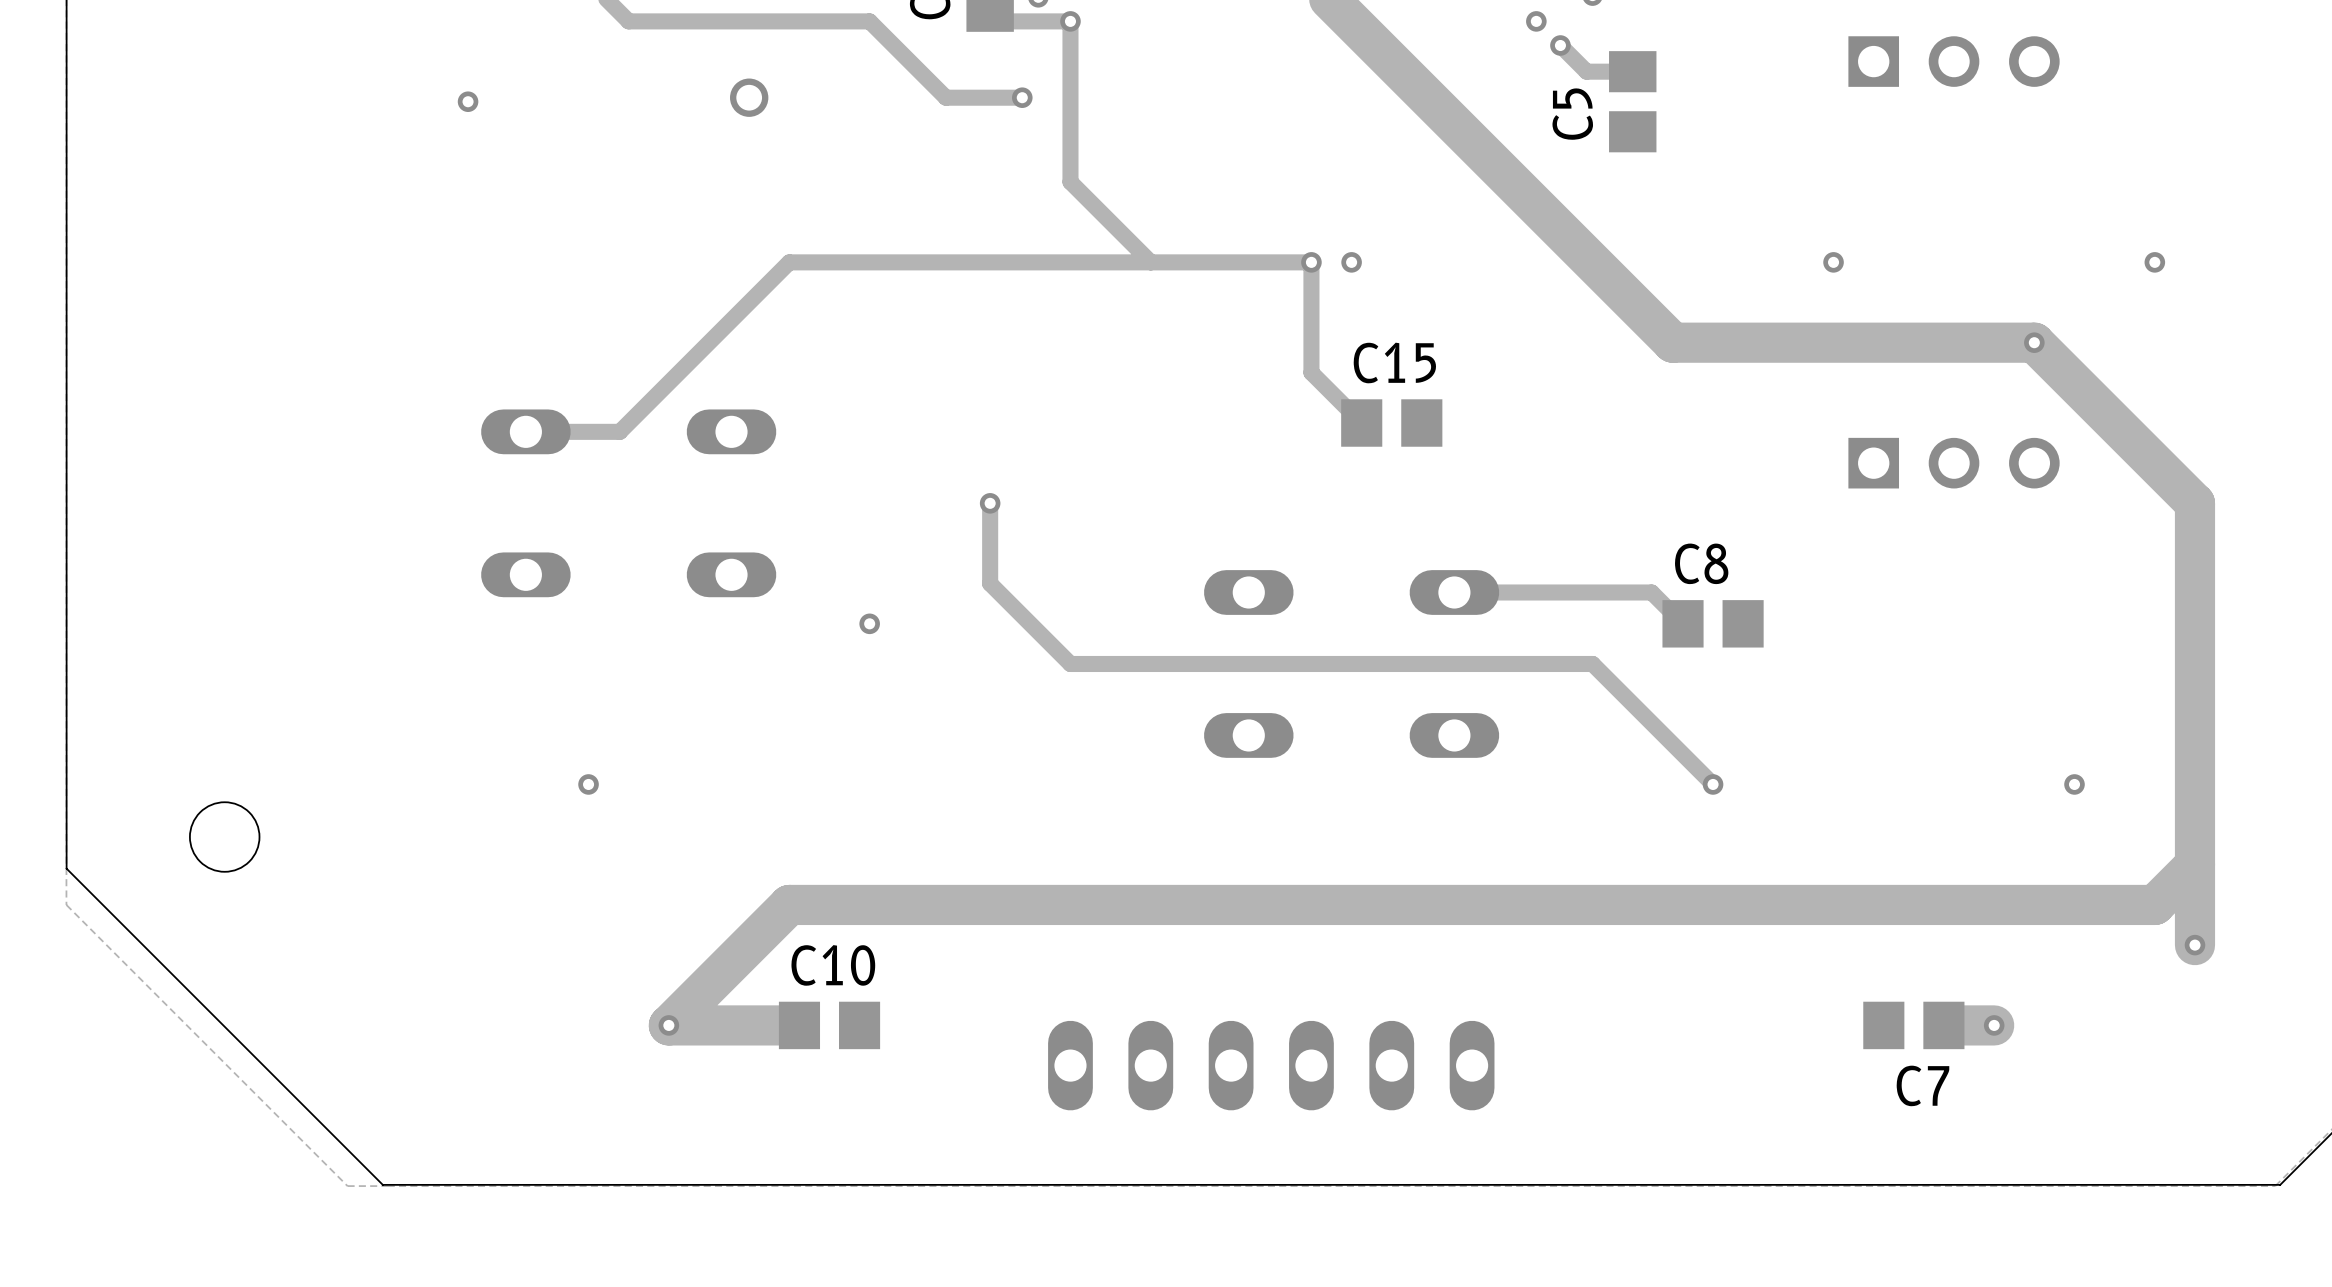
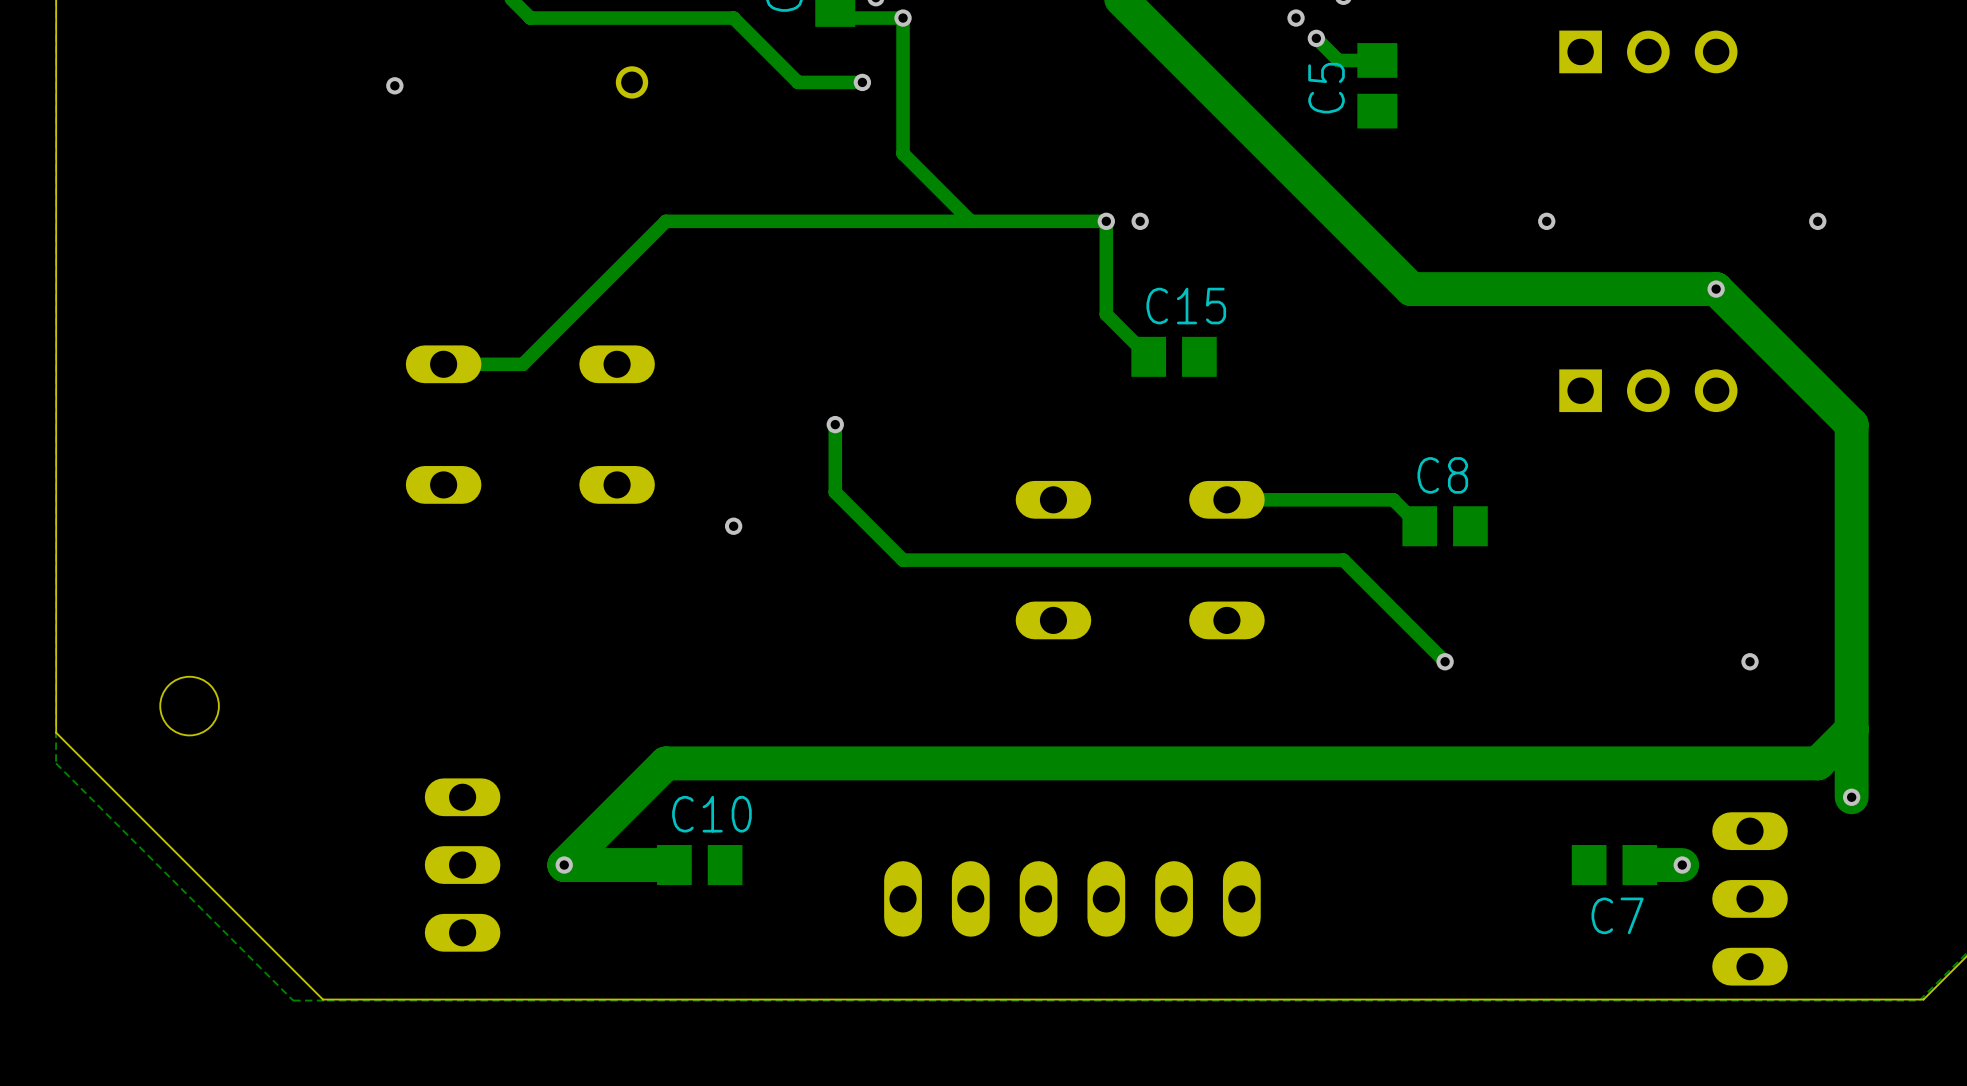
via: (588, 784) -> none
part: none -> (462, 865)
part: none -> (1750, 898)

